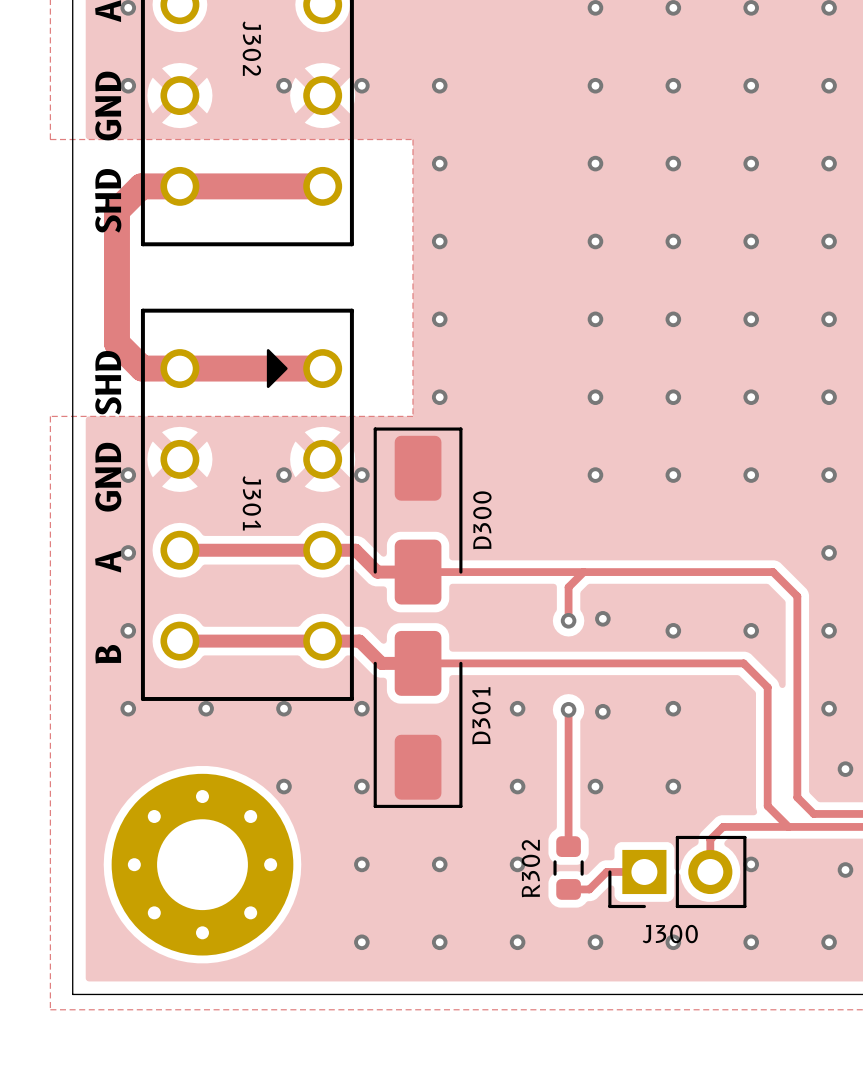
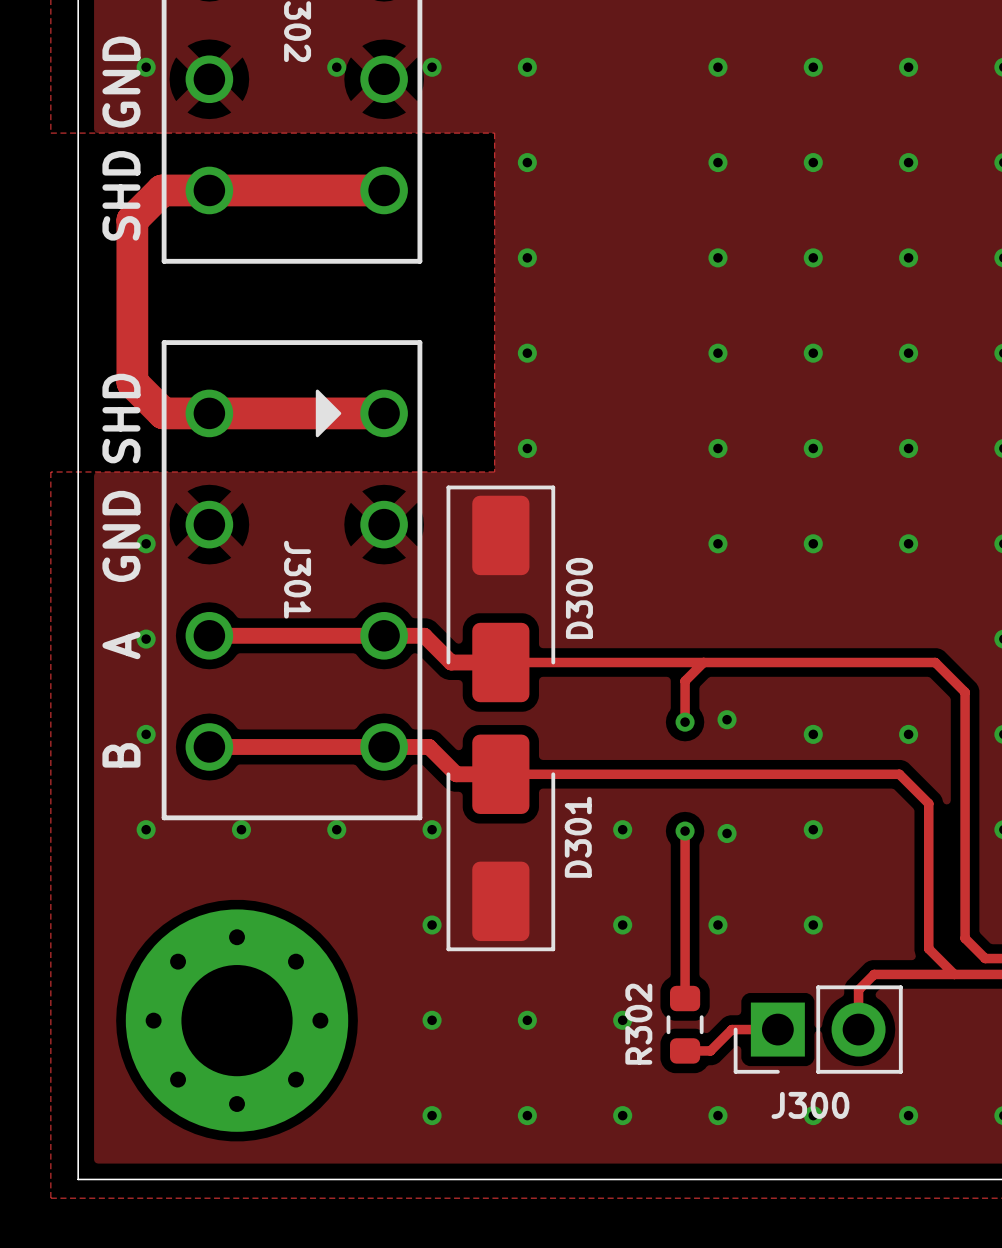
via: (283, 475) -> none
via: (361, 475) -> none
via: (283, 786) -> none
via: (751, 864) -> none

